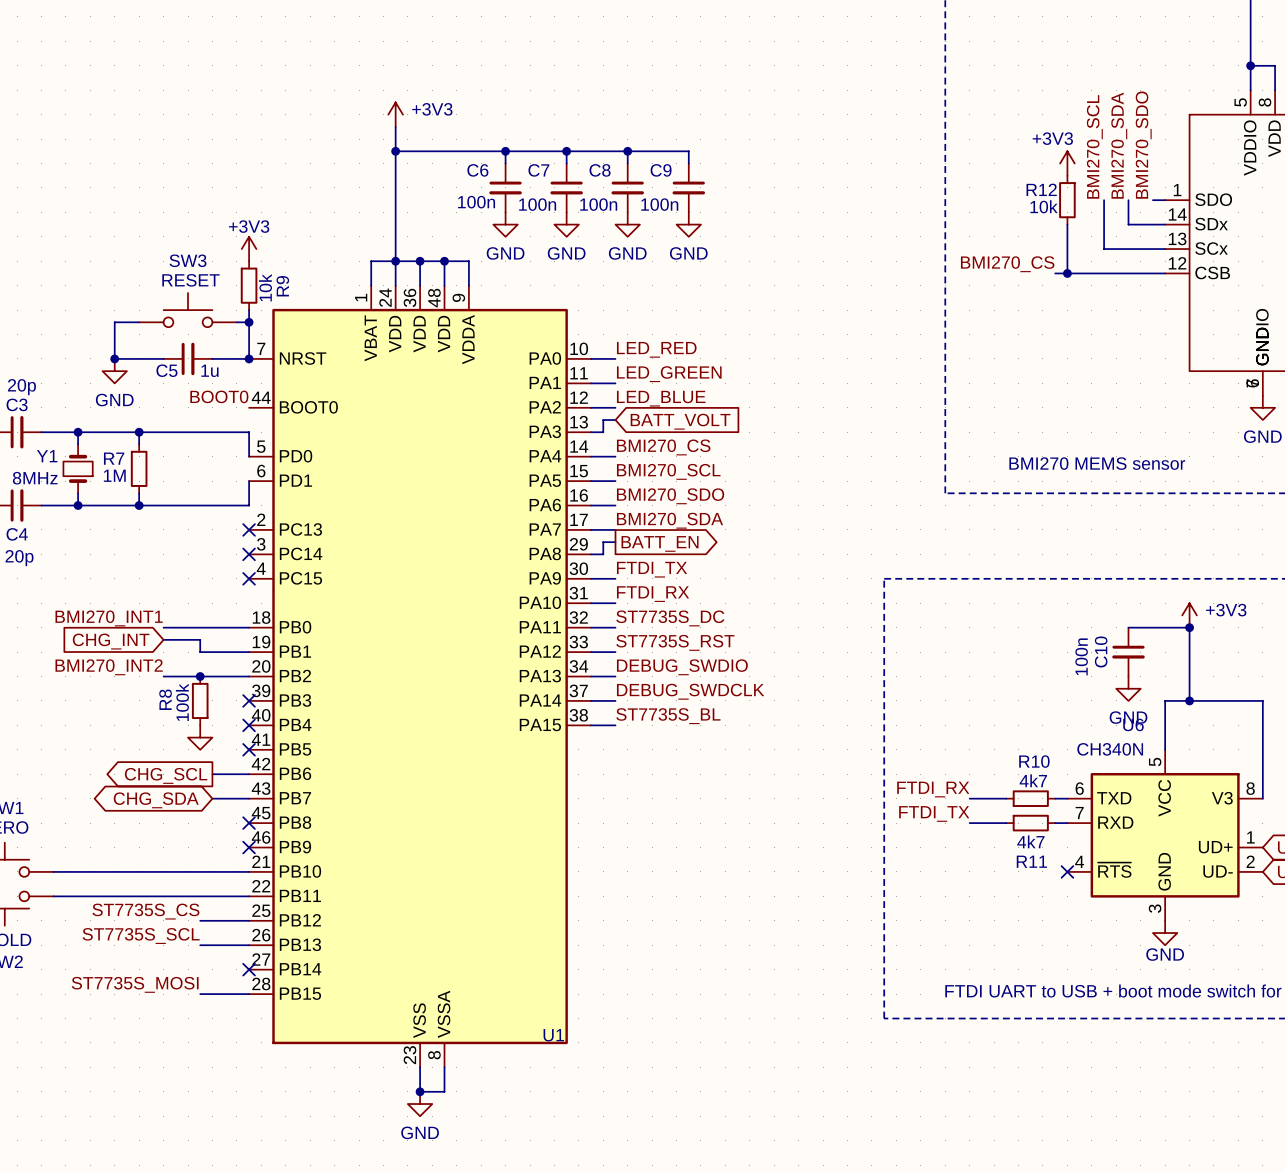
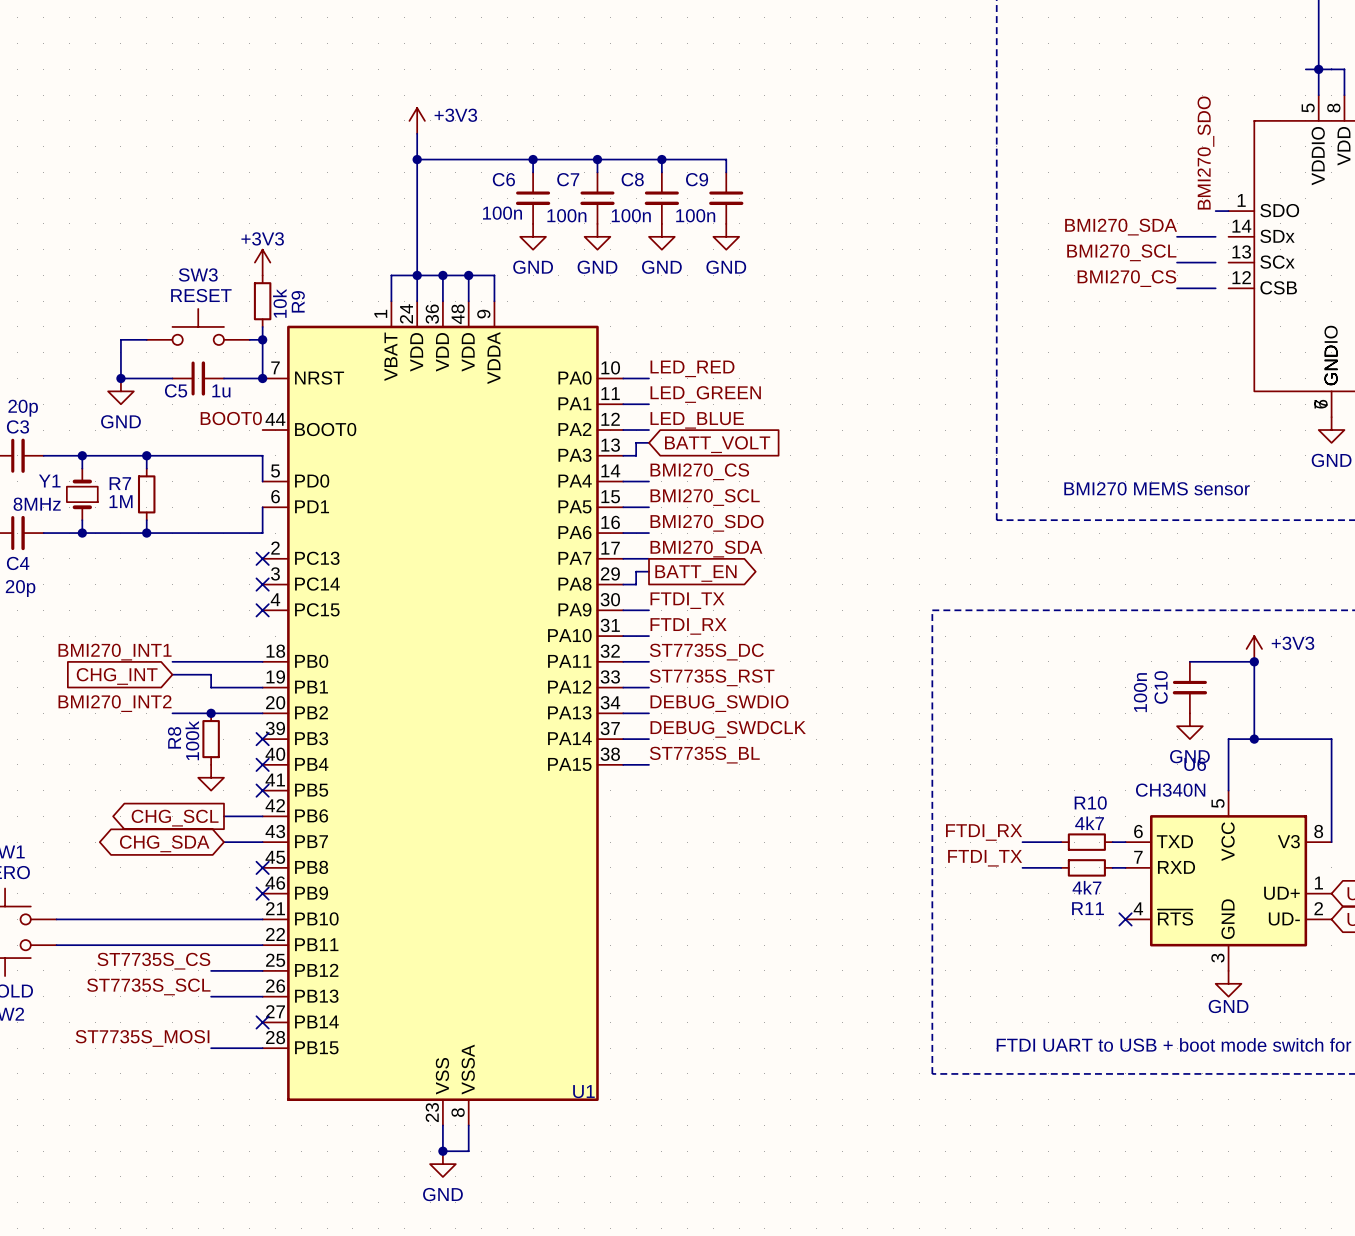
label rotation: 0° (1119, 145) -> 90° clockwise (1121, 227)
label rotation: 0° (1094, 146) -> 90° clockwise (1121, 252)
power symbol: +3V3 (1067, 163) -> none
R12: 10k (1067, 200) -> none
wire: (1104, 200) (1104, 249) (1116, 249) -> none
wire: (1128, 200) (1128, 224) -> (1177, 236) (1189, 236)
wire: (1067, 224) (1067, 273) -> none
wire: (1152, 224) (1165, 224) -> (1305, 69) (1318, 69)
wire: (1152, 249) (1165, 249) -> none
label position: BMI270_CS (1007, 264) -> BMI270_CS (1126, 278)
wire: (1055, 273) (1116, 273) -> none
junction: (1067, 273) -> none
wire: (1152, 273) (1165, 273) -> none

